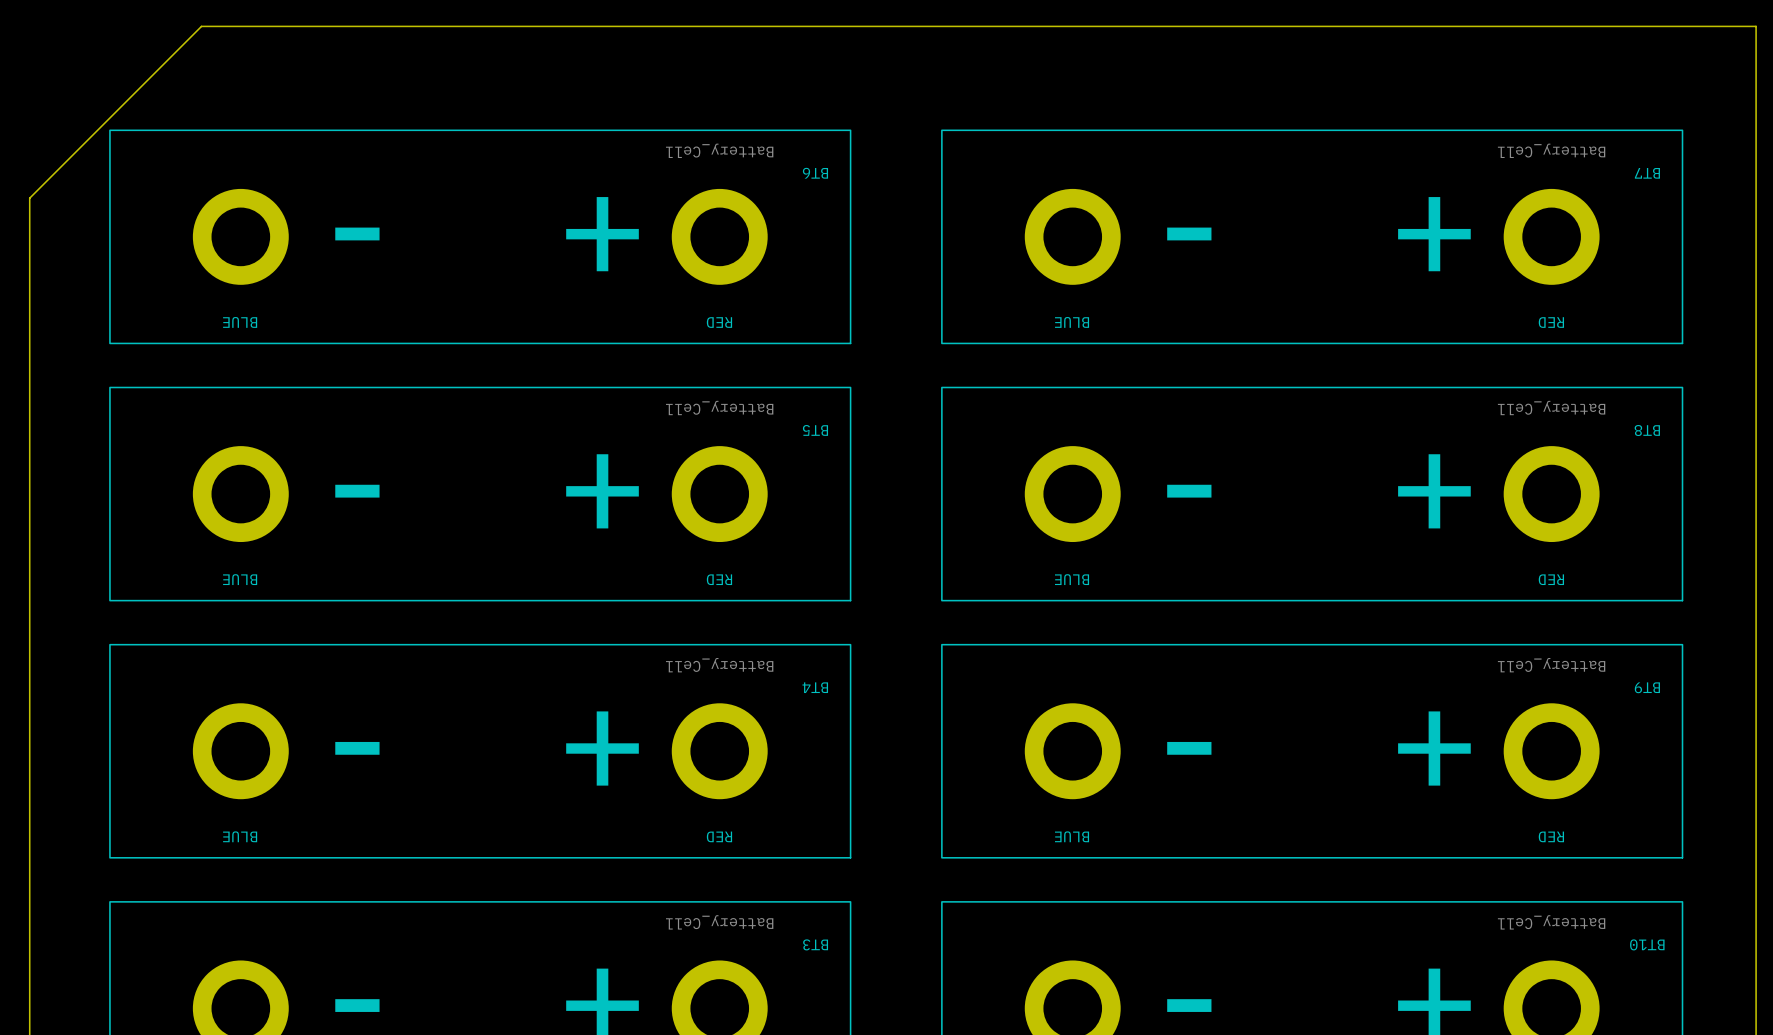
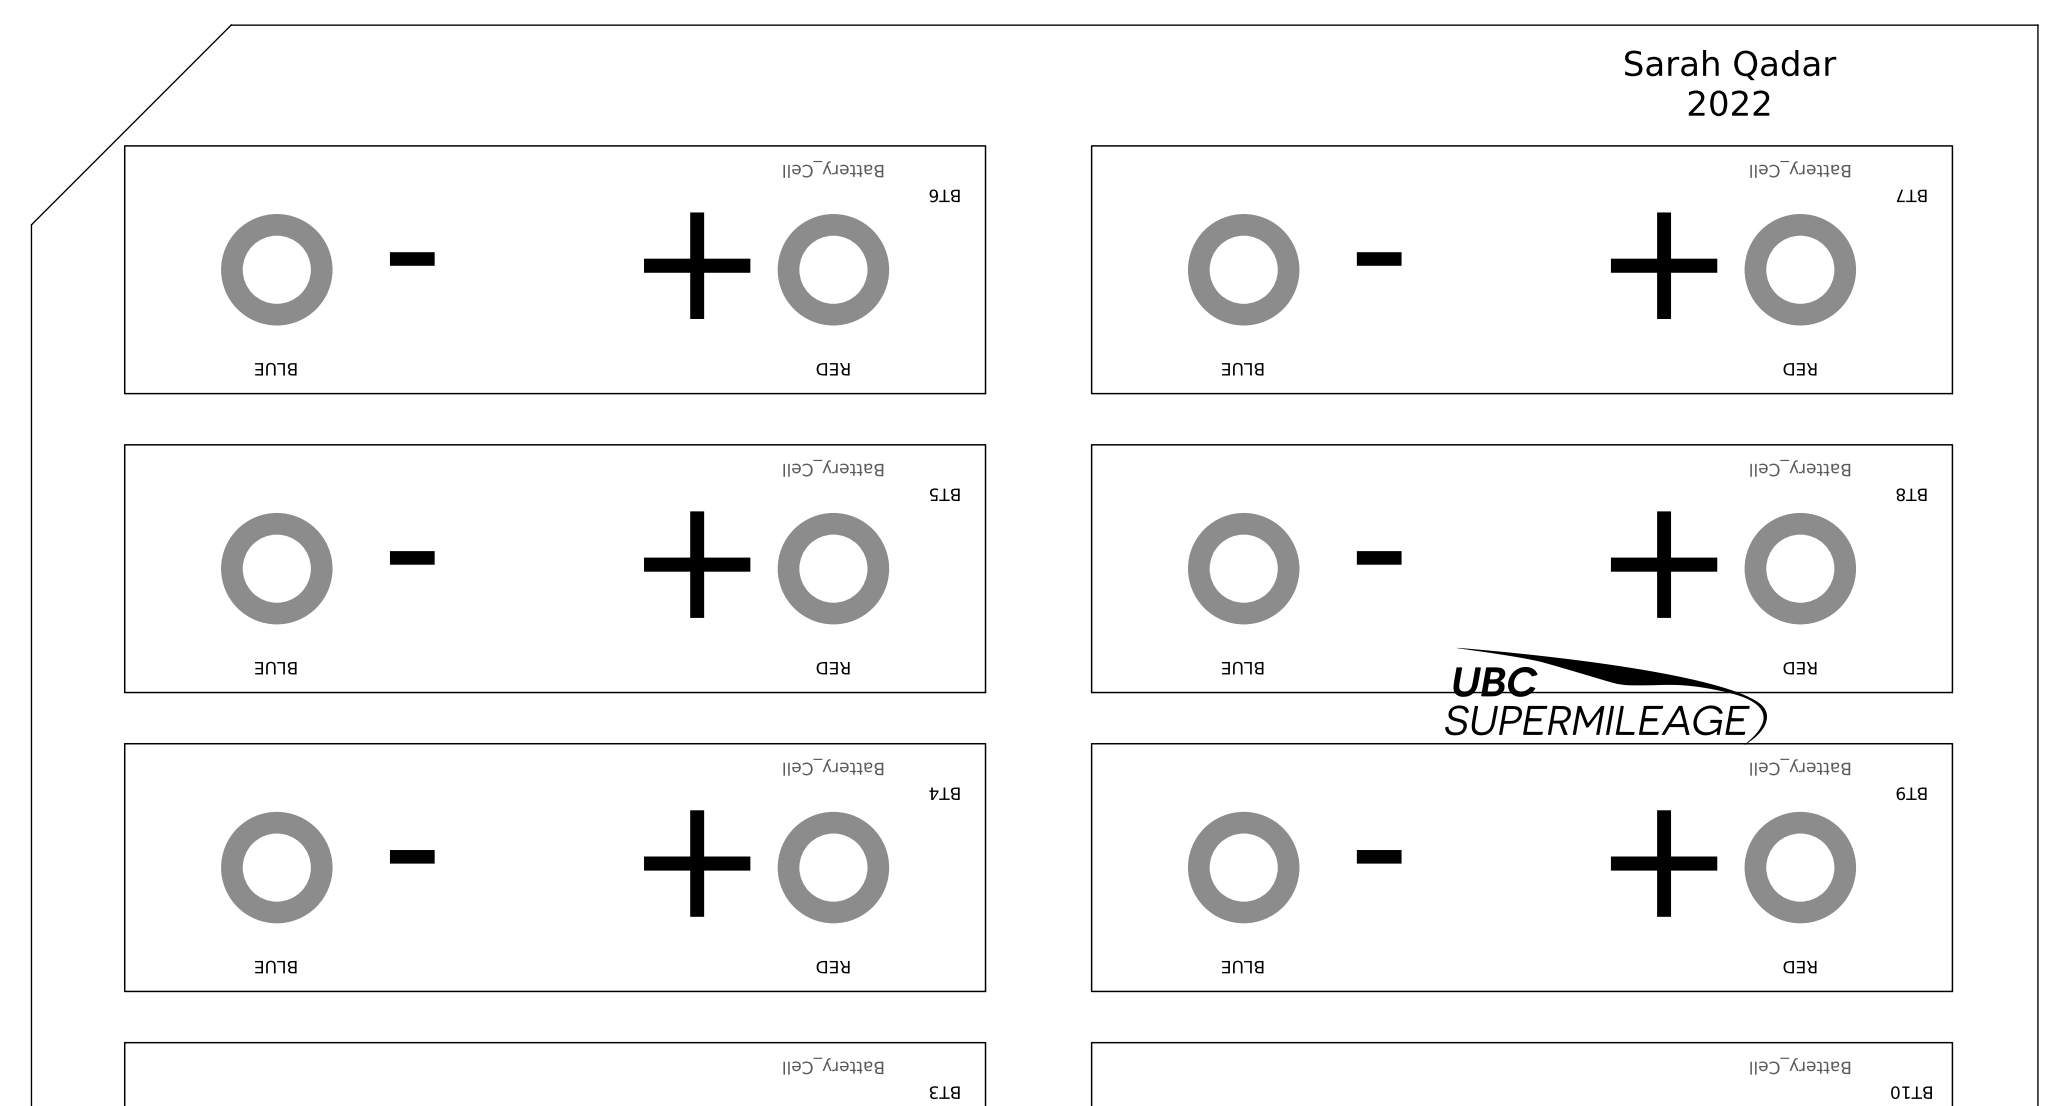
text: none -> Sarah Qadar (1730, 65)
text: none -> 2022 (1729, 103)
drawing: none -> [1445, 647, 1768, 745]

